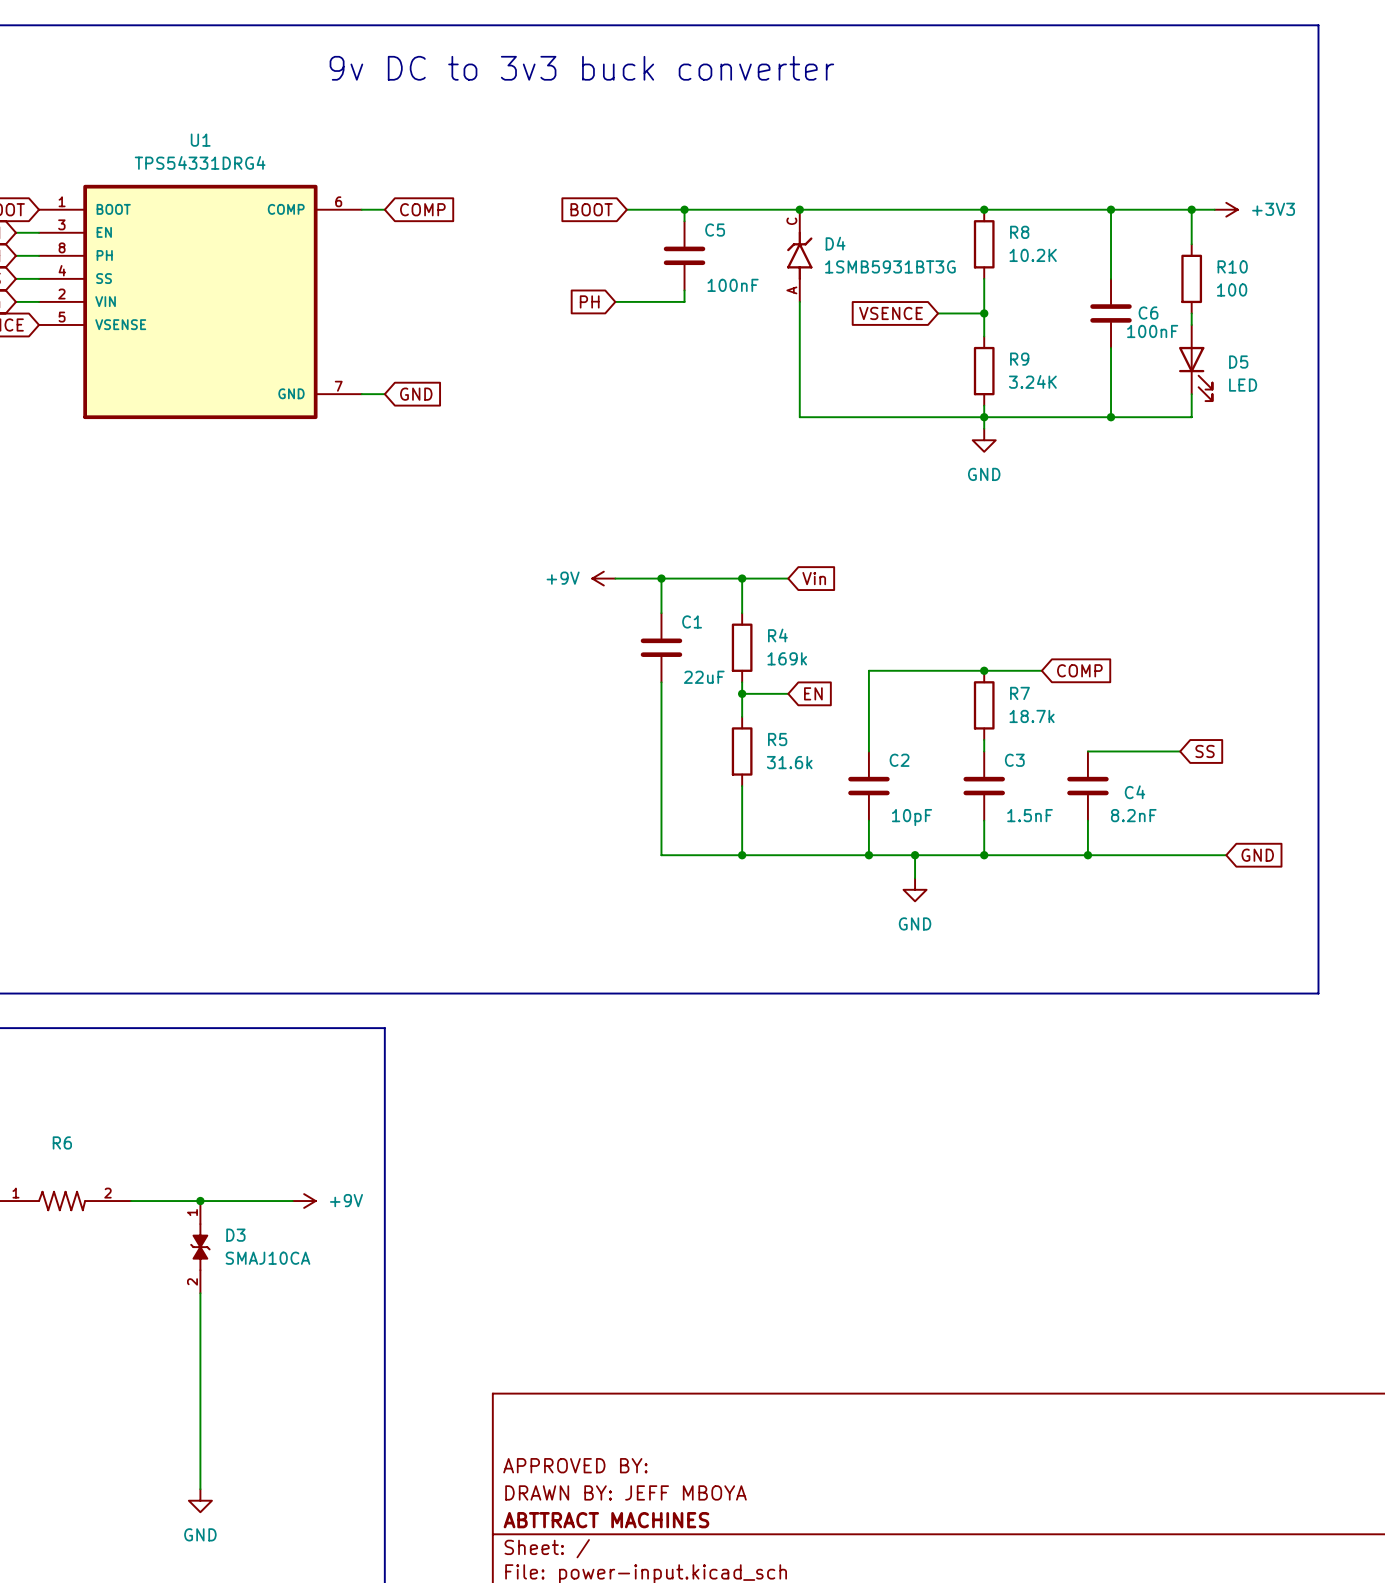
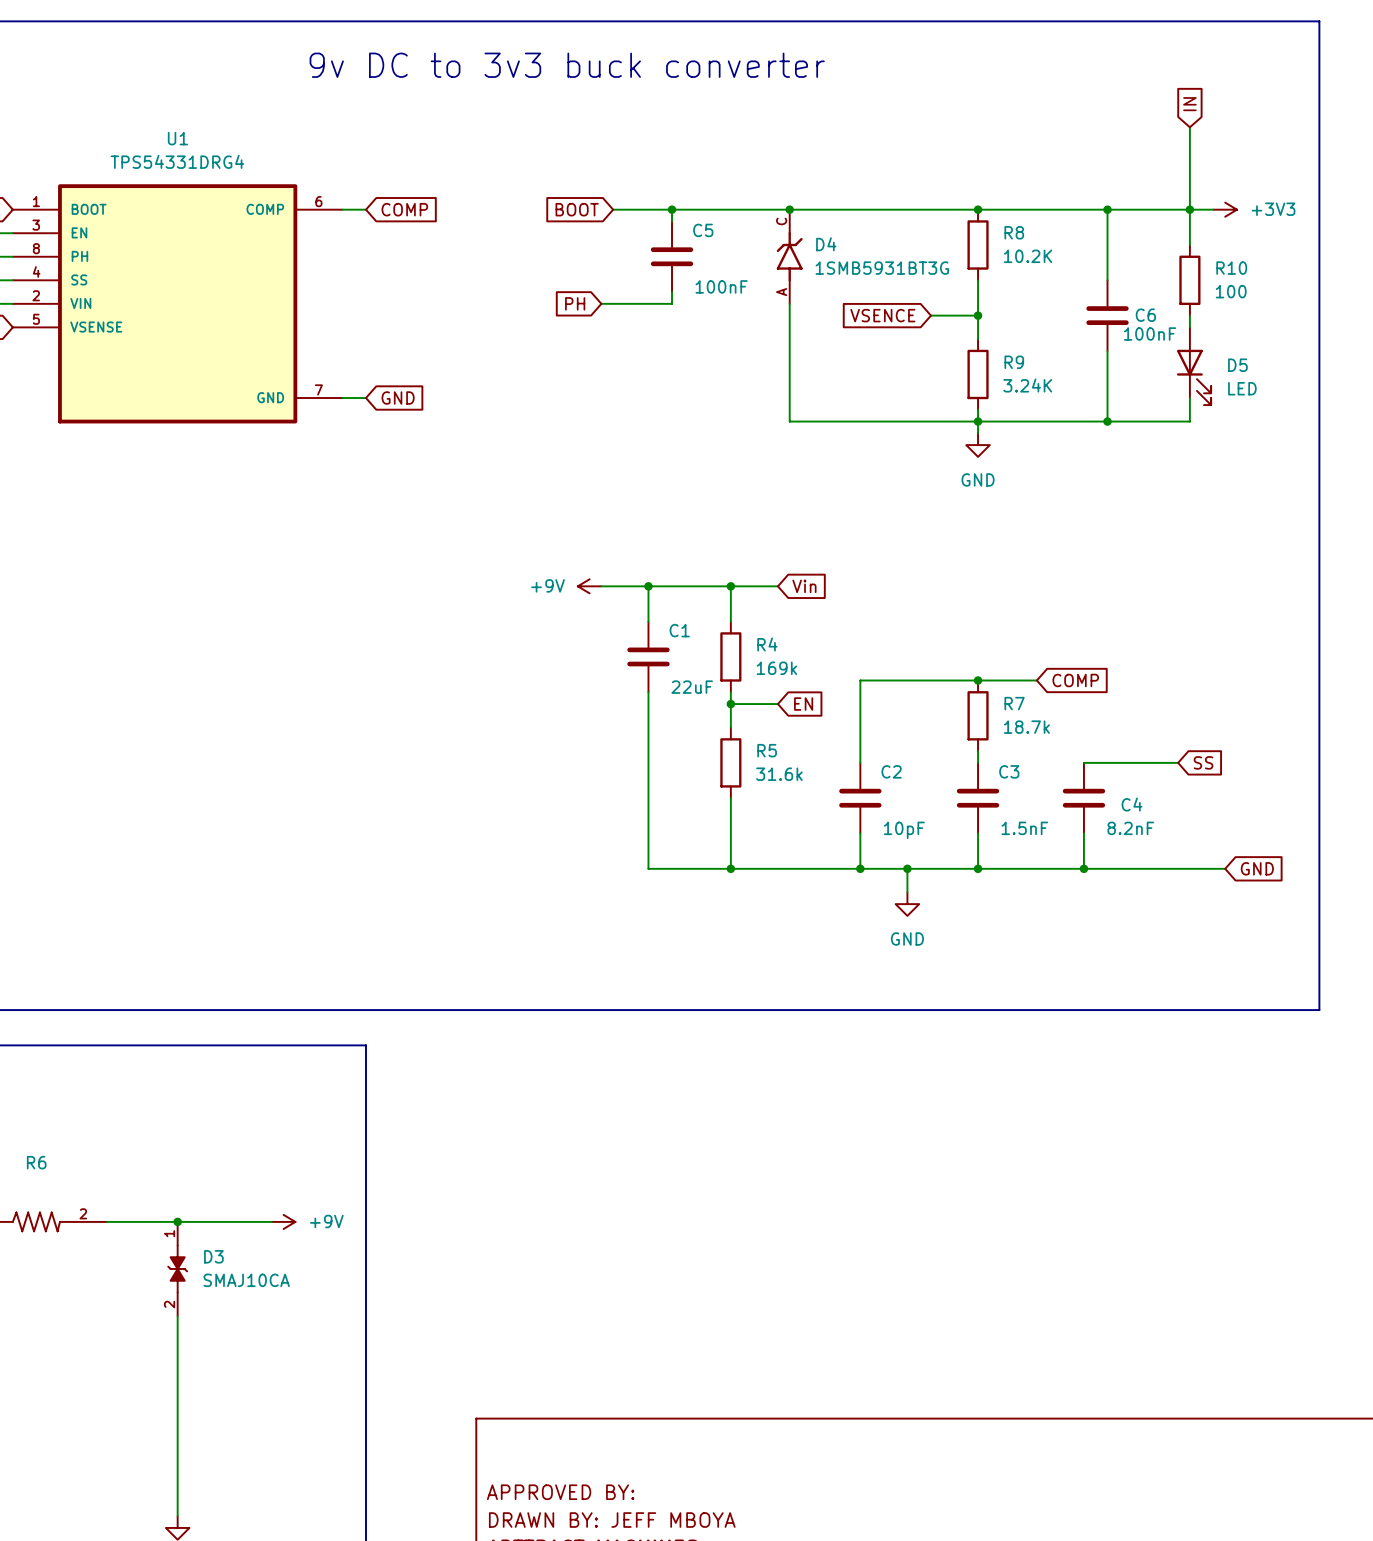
global label: none -> IN (1189, 104)
wire: none -> (1189, 127) (1189, 209)

